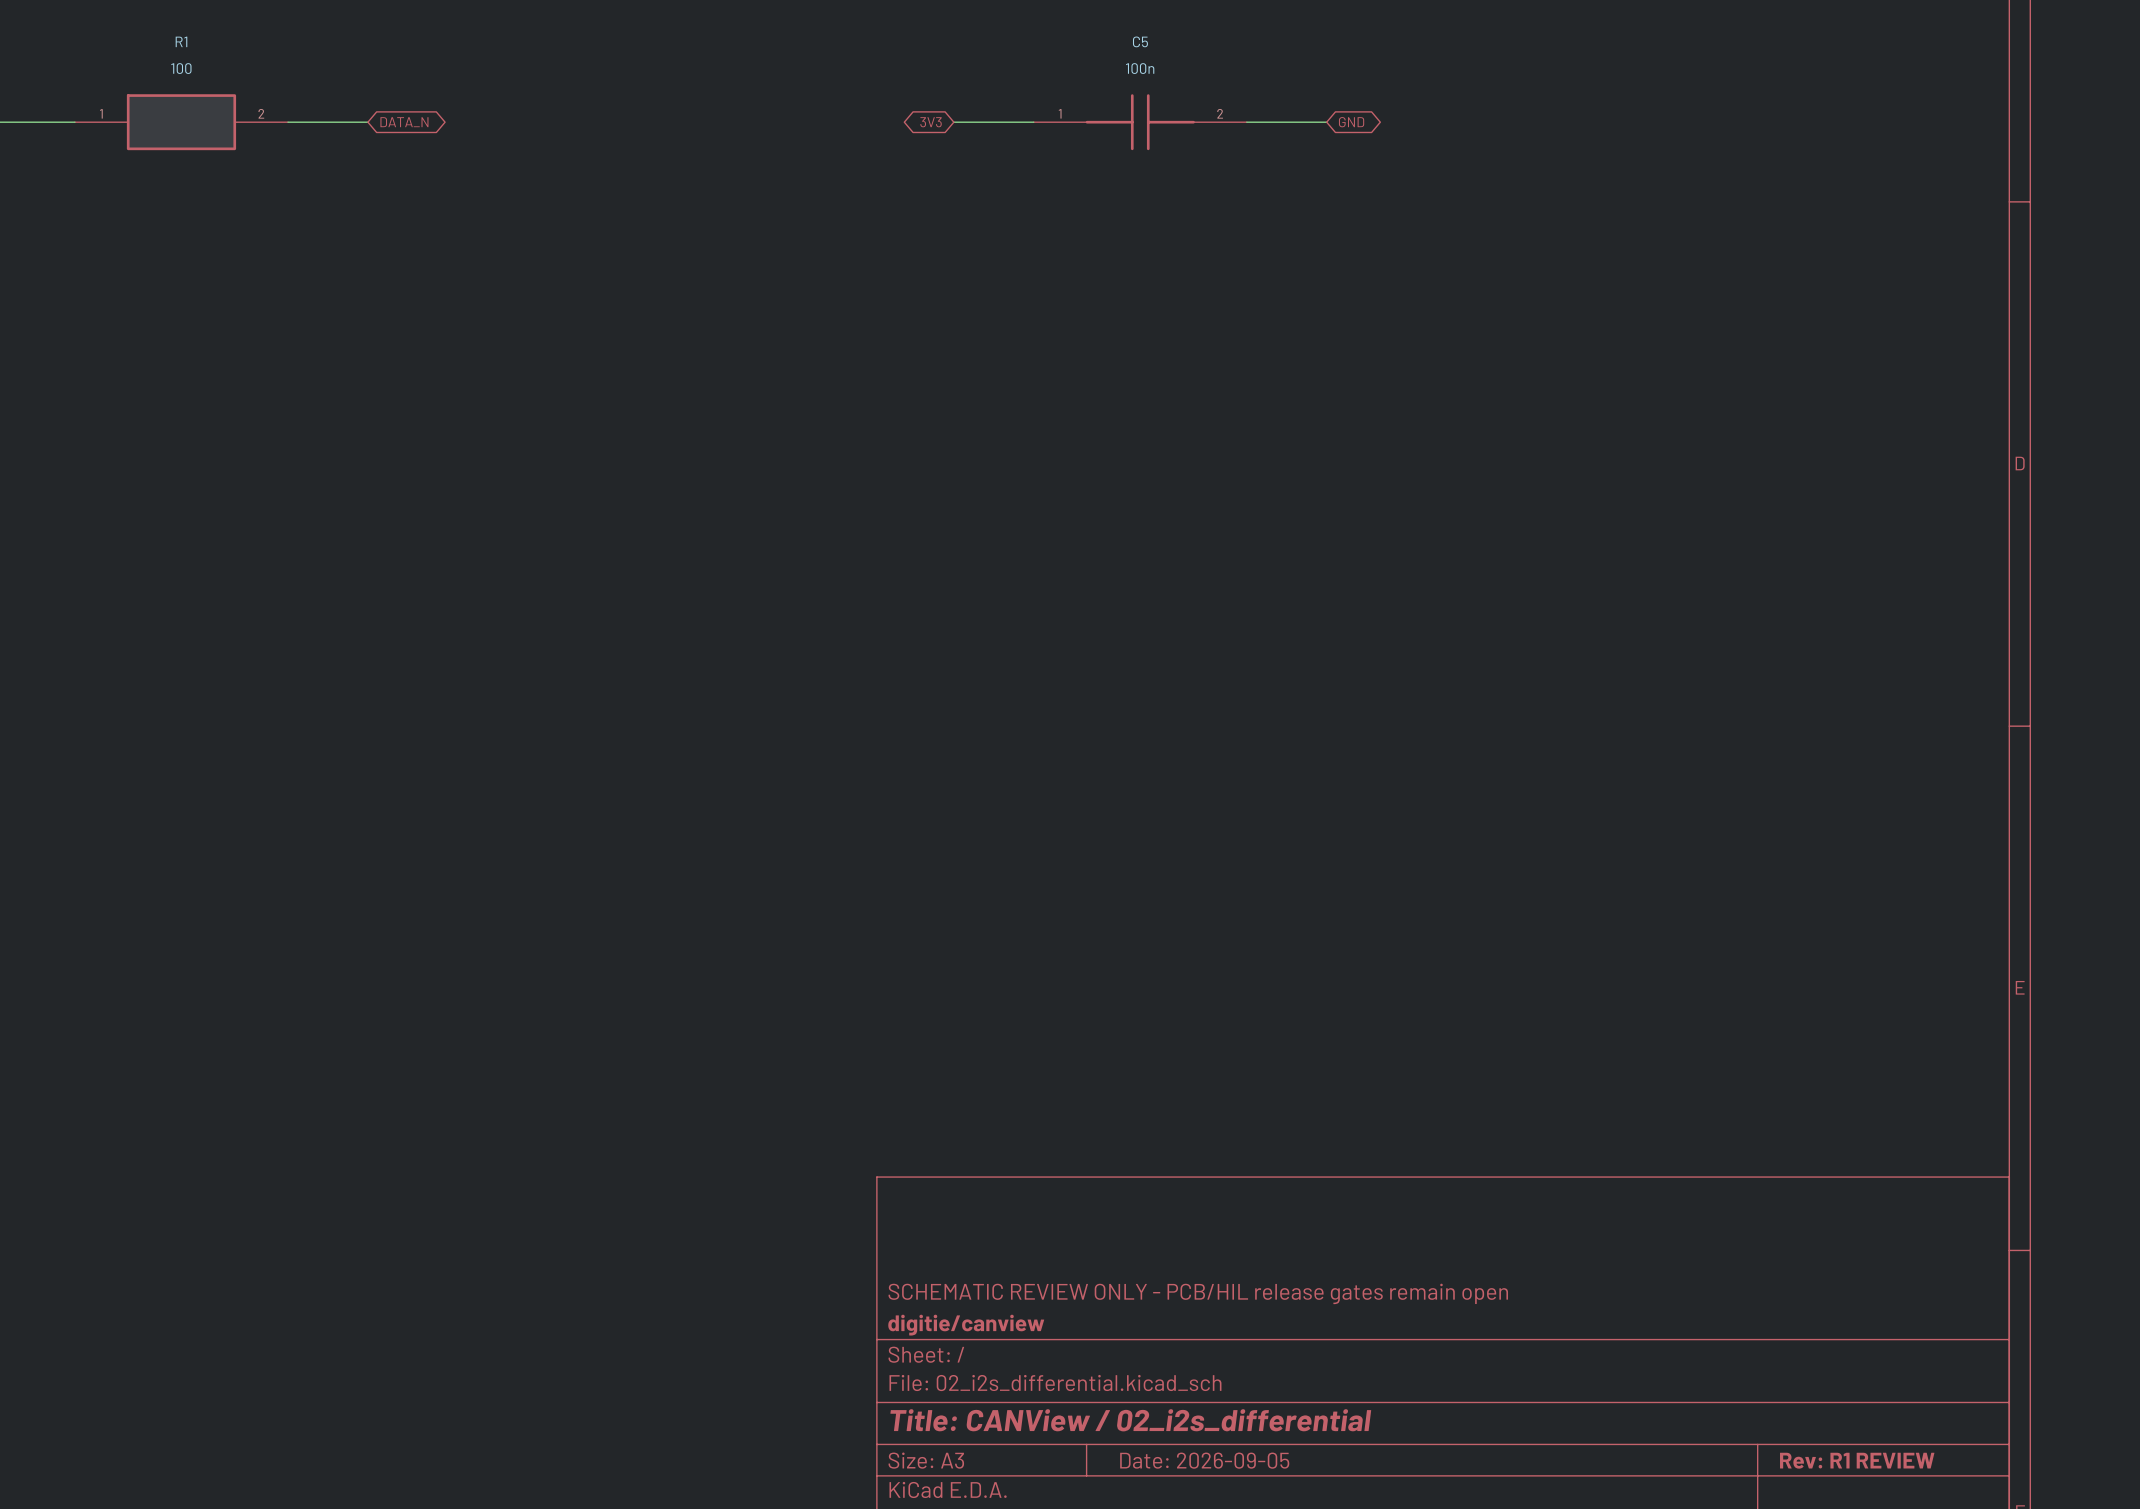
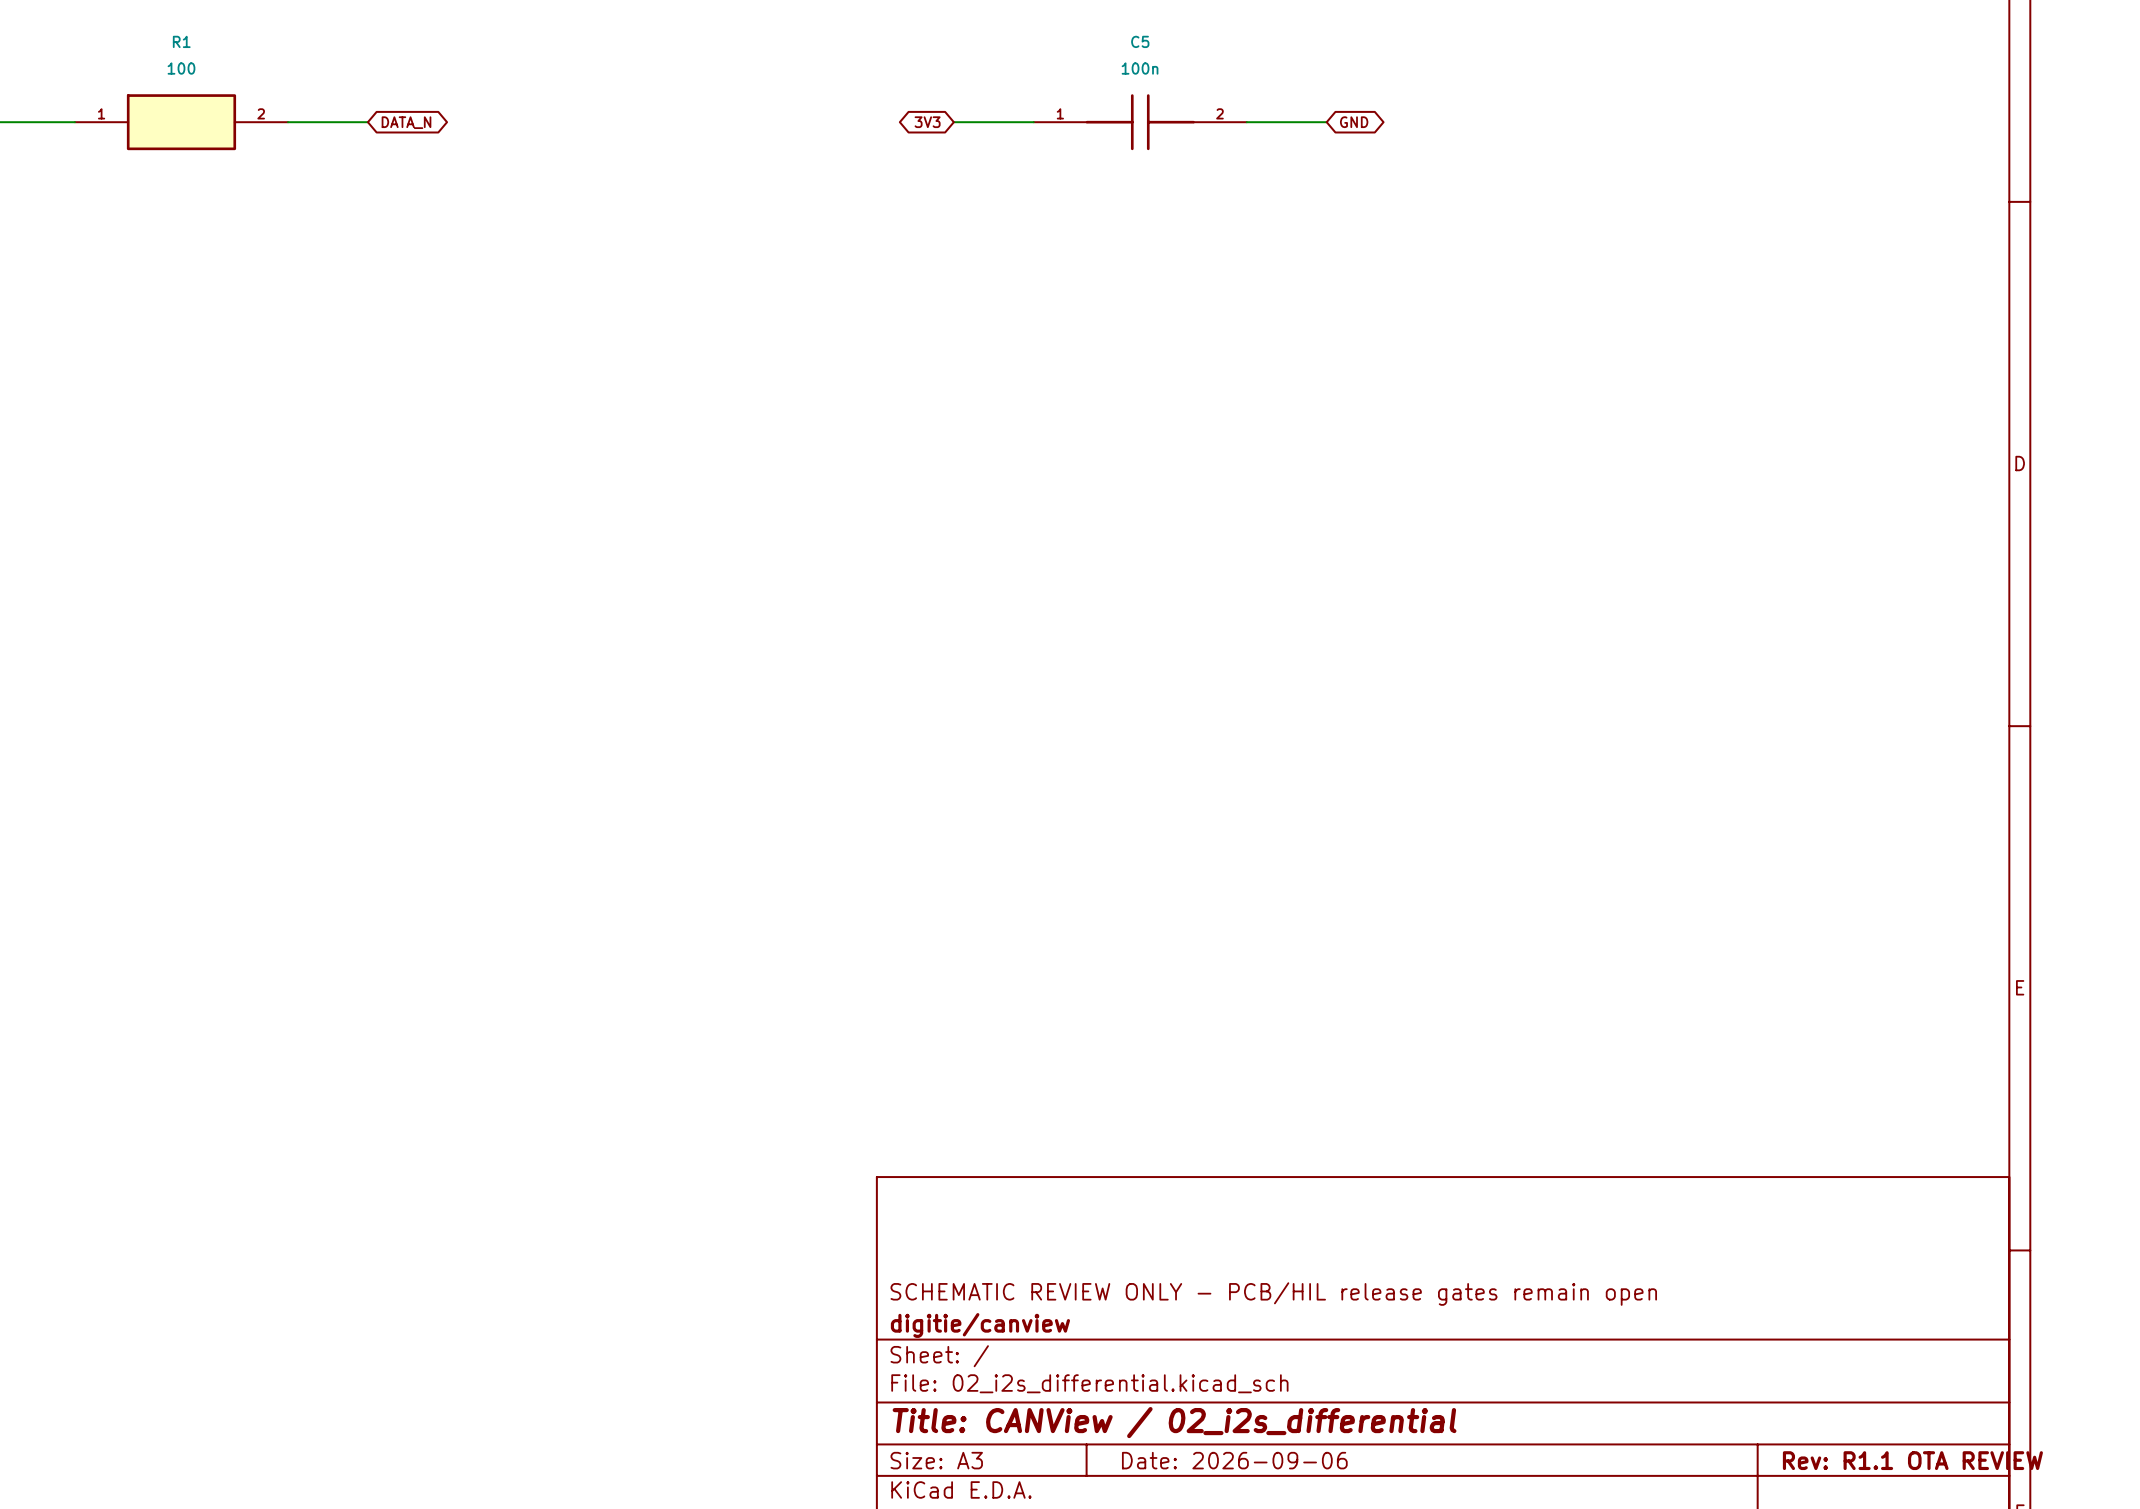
title block: Date: 2026-09-05 (1204, 1460) -> Date: 2026-09-06 (1234, 1460)
title block: Rev: R1 REVIEW (1857, 1460) -> Rev: R1.1 OTA REVIEW (1912, 1460)

